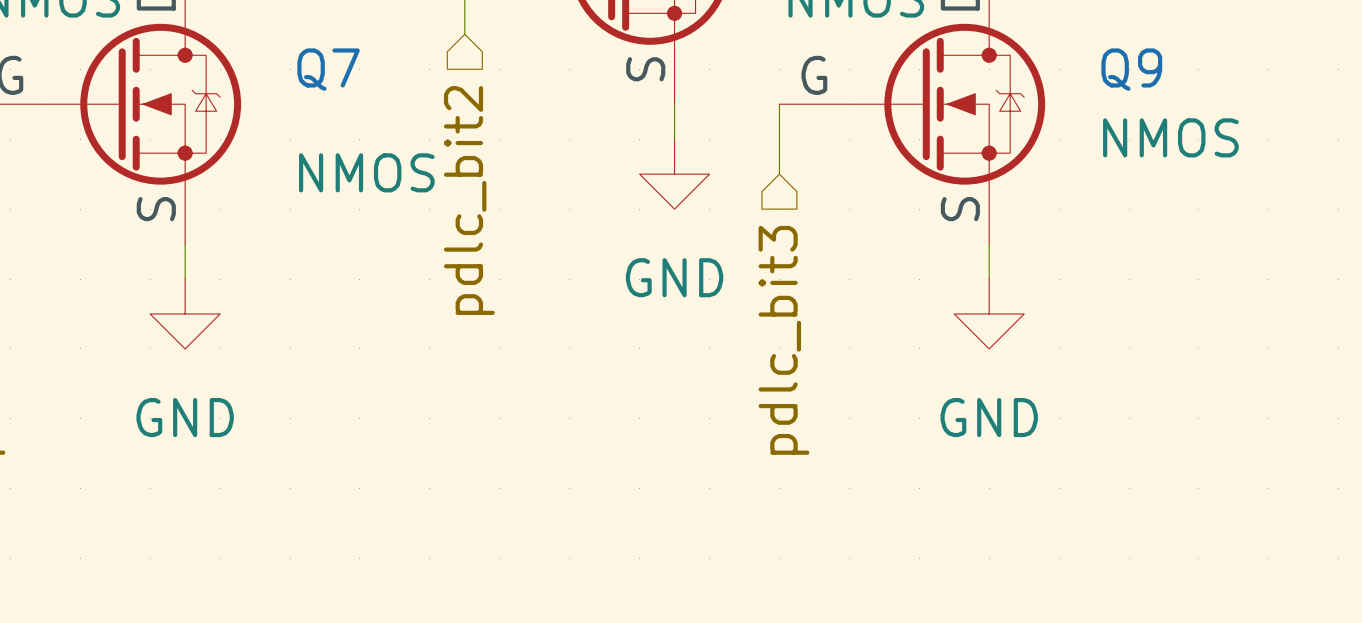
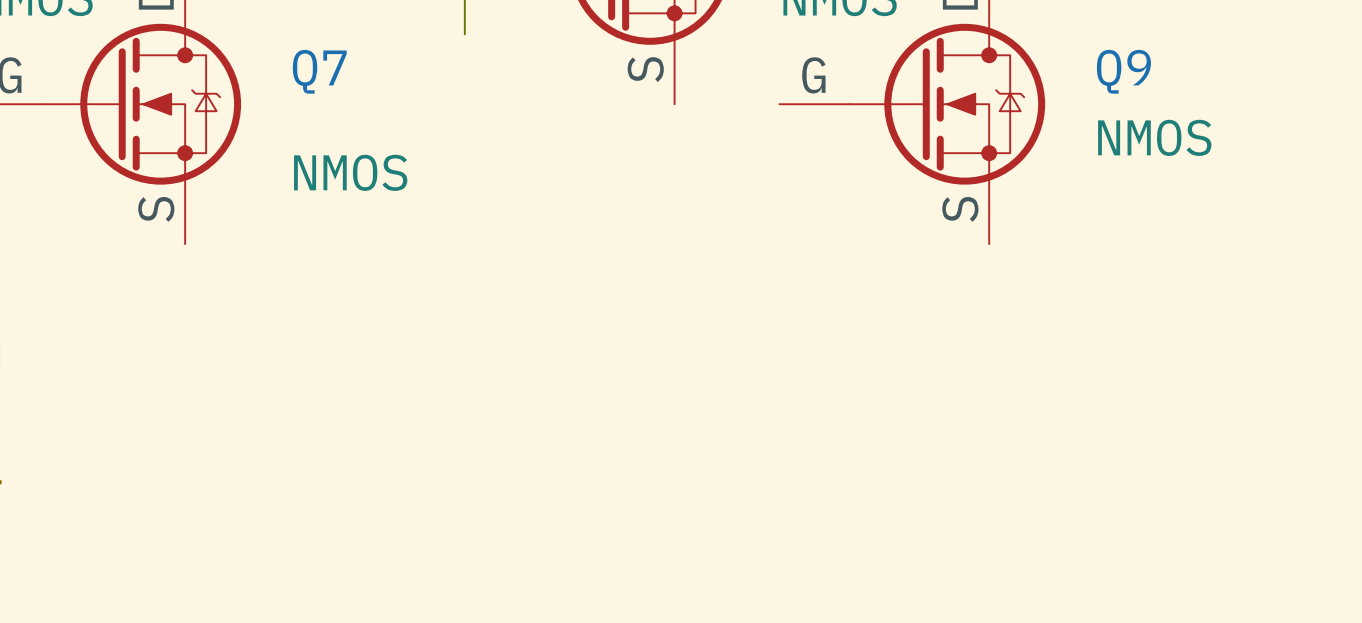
wire: (674, 104) (674, 139) -> none
wire: (779, 104) (779, 174) -> none
power symbol: GND (674, 174) -> none
hierarchical label: pdlc_bit2 (469, 200) -> none
wire: (185, 244) (185, 279) -> none
wire: (989, 244) (989, 279) -> none
power symbol: GND (185, 313) -> none
power symbol: GND (989, 313) -> none
hierarchical label: pdlc_bit3 (783, 340) -> none

